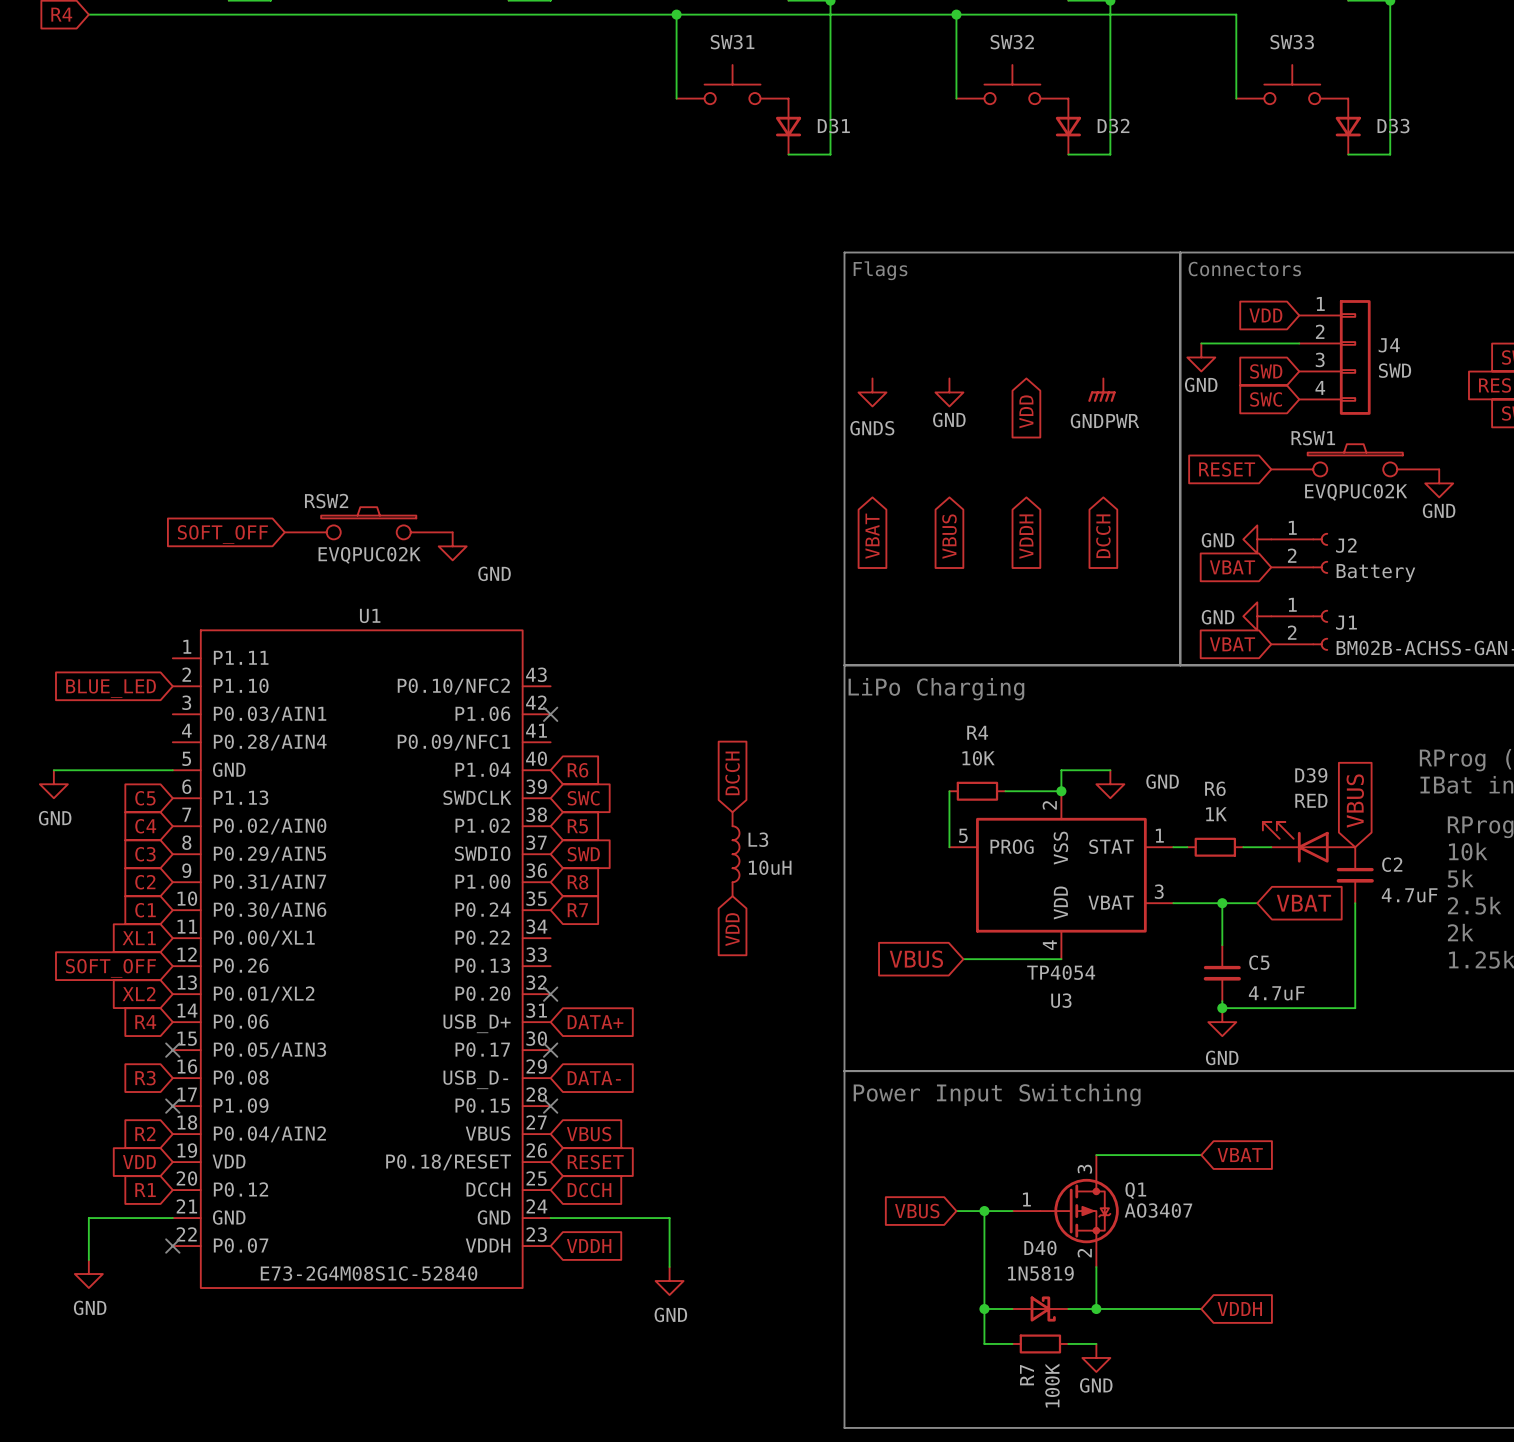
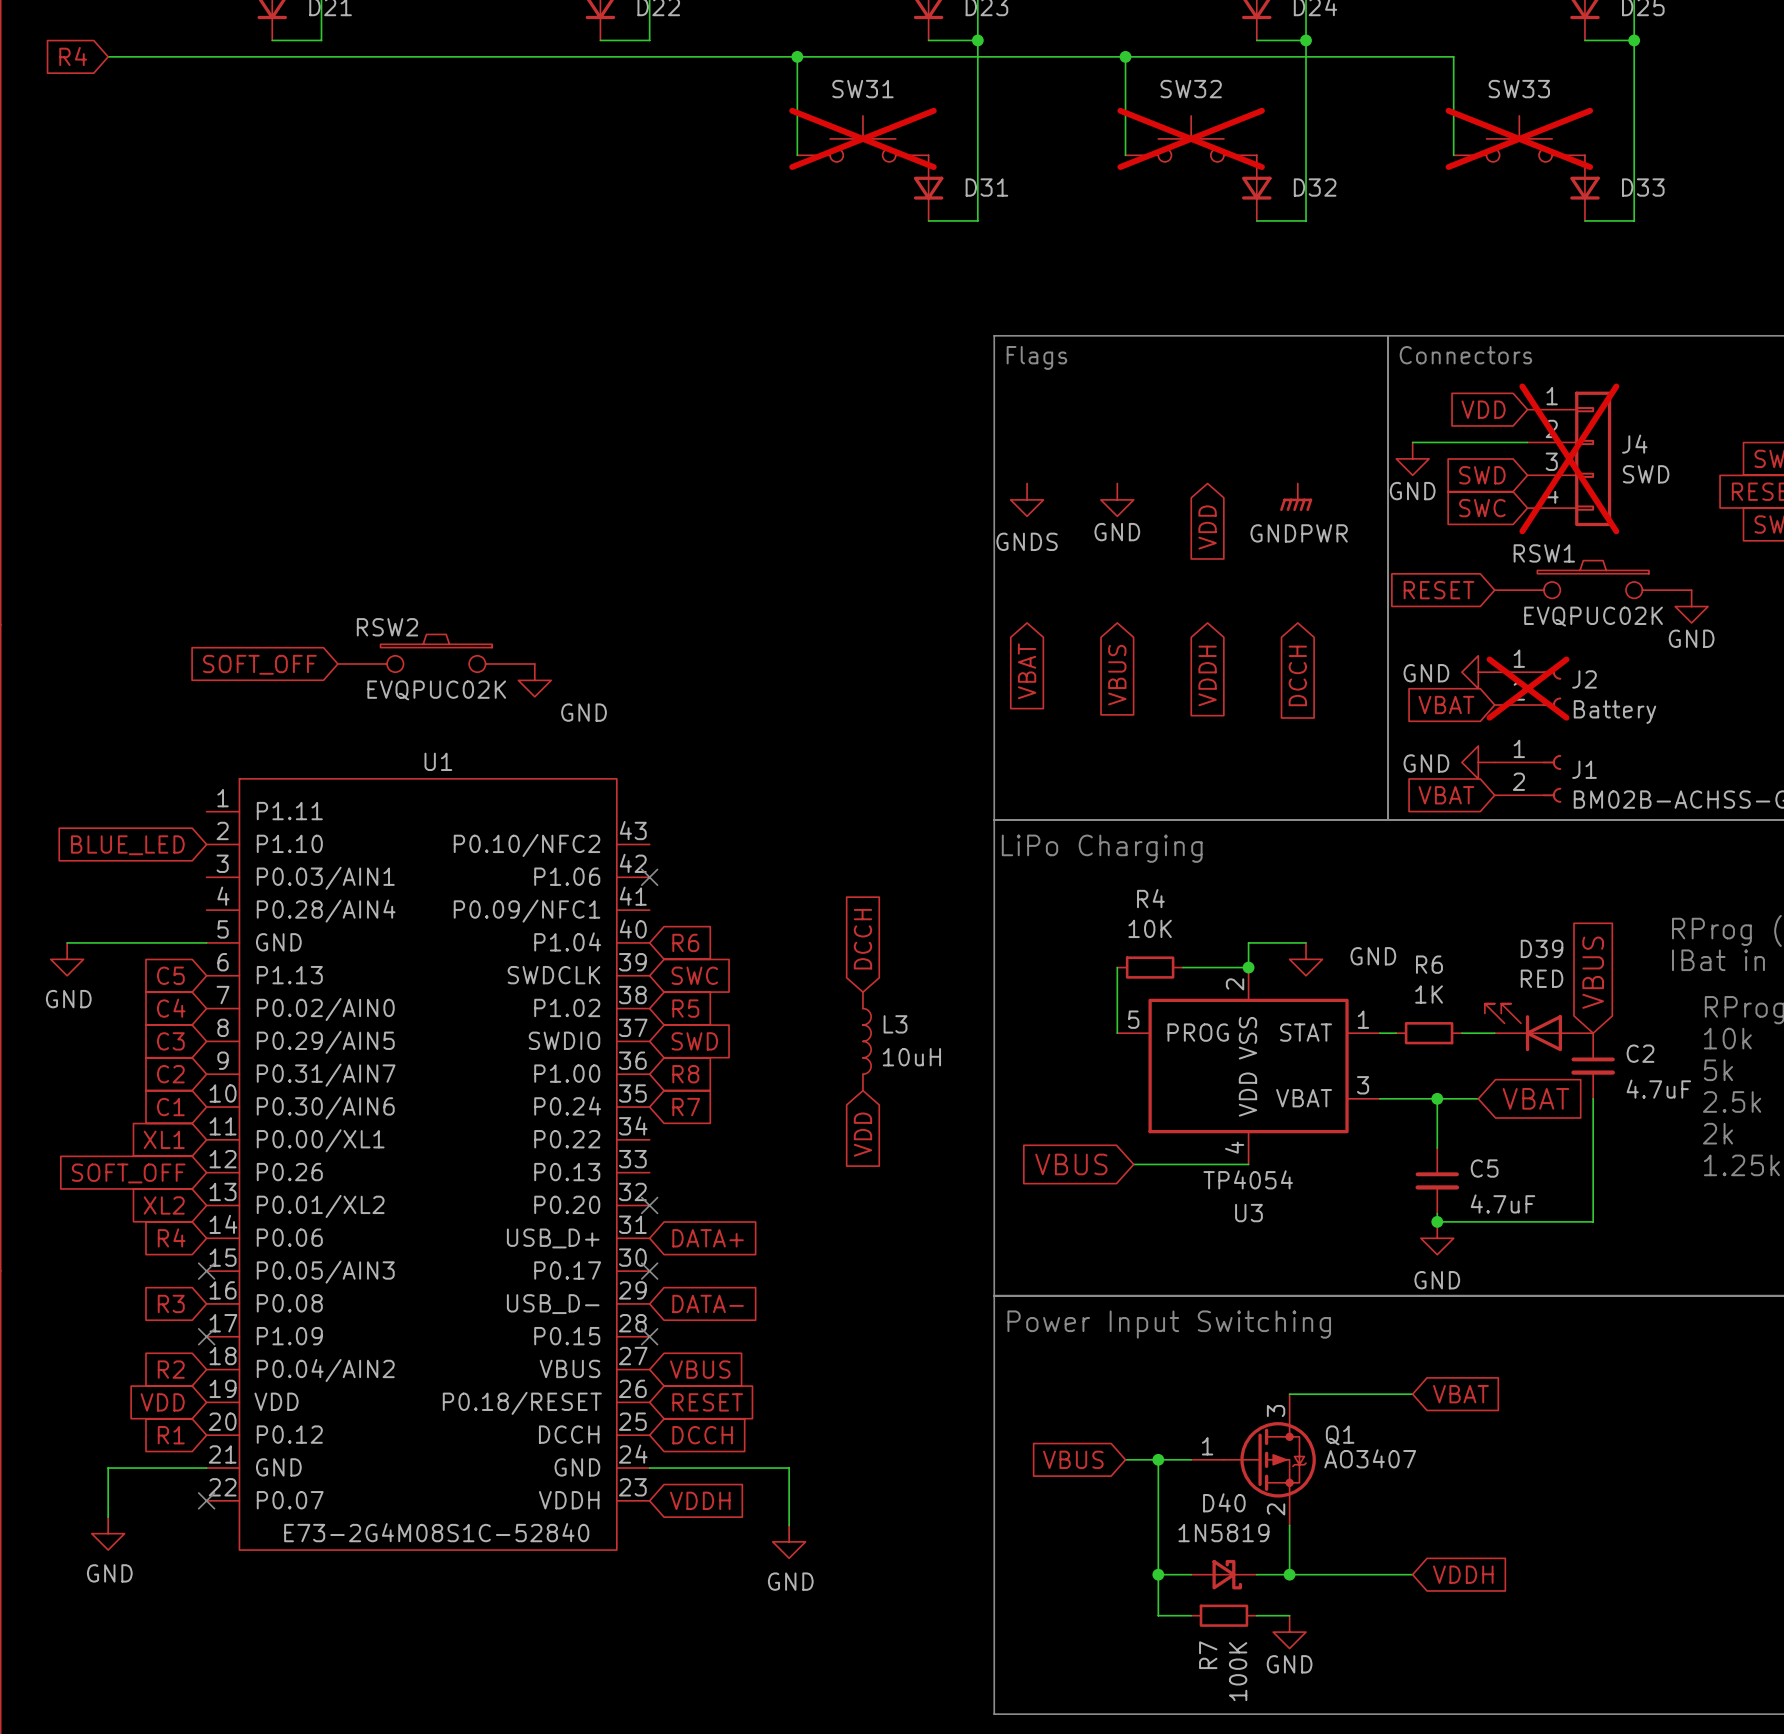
SW31 do-not-place cross: none -> (862, 138)
SW32 do-not-place cross: none -> (1191, 138)
SW33 do-not-place cross: none -> (1519, 138)
J4 do-not-place cross: none -> (1569, 458)
J2 do-not-place cross: none -> (1528, 688)

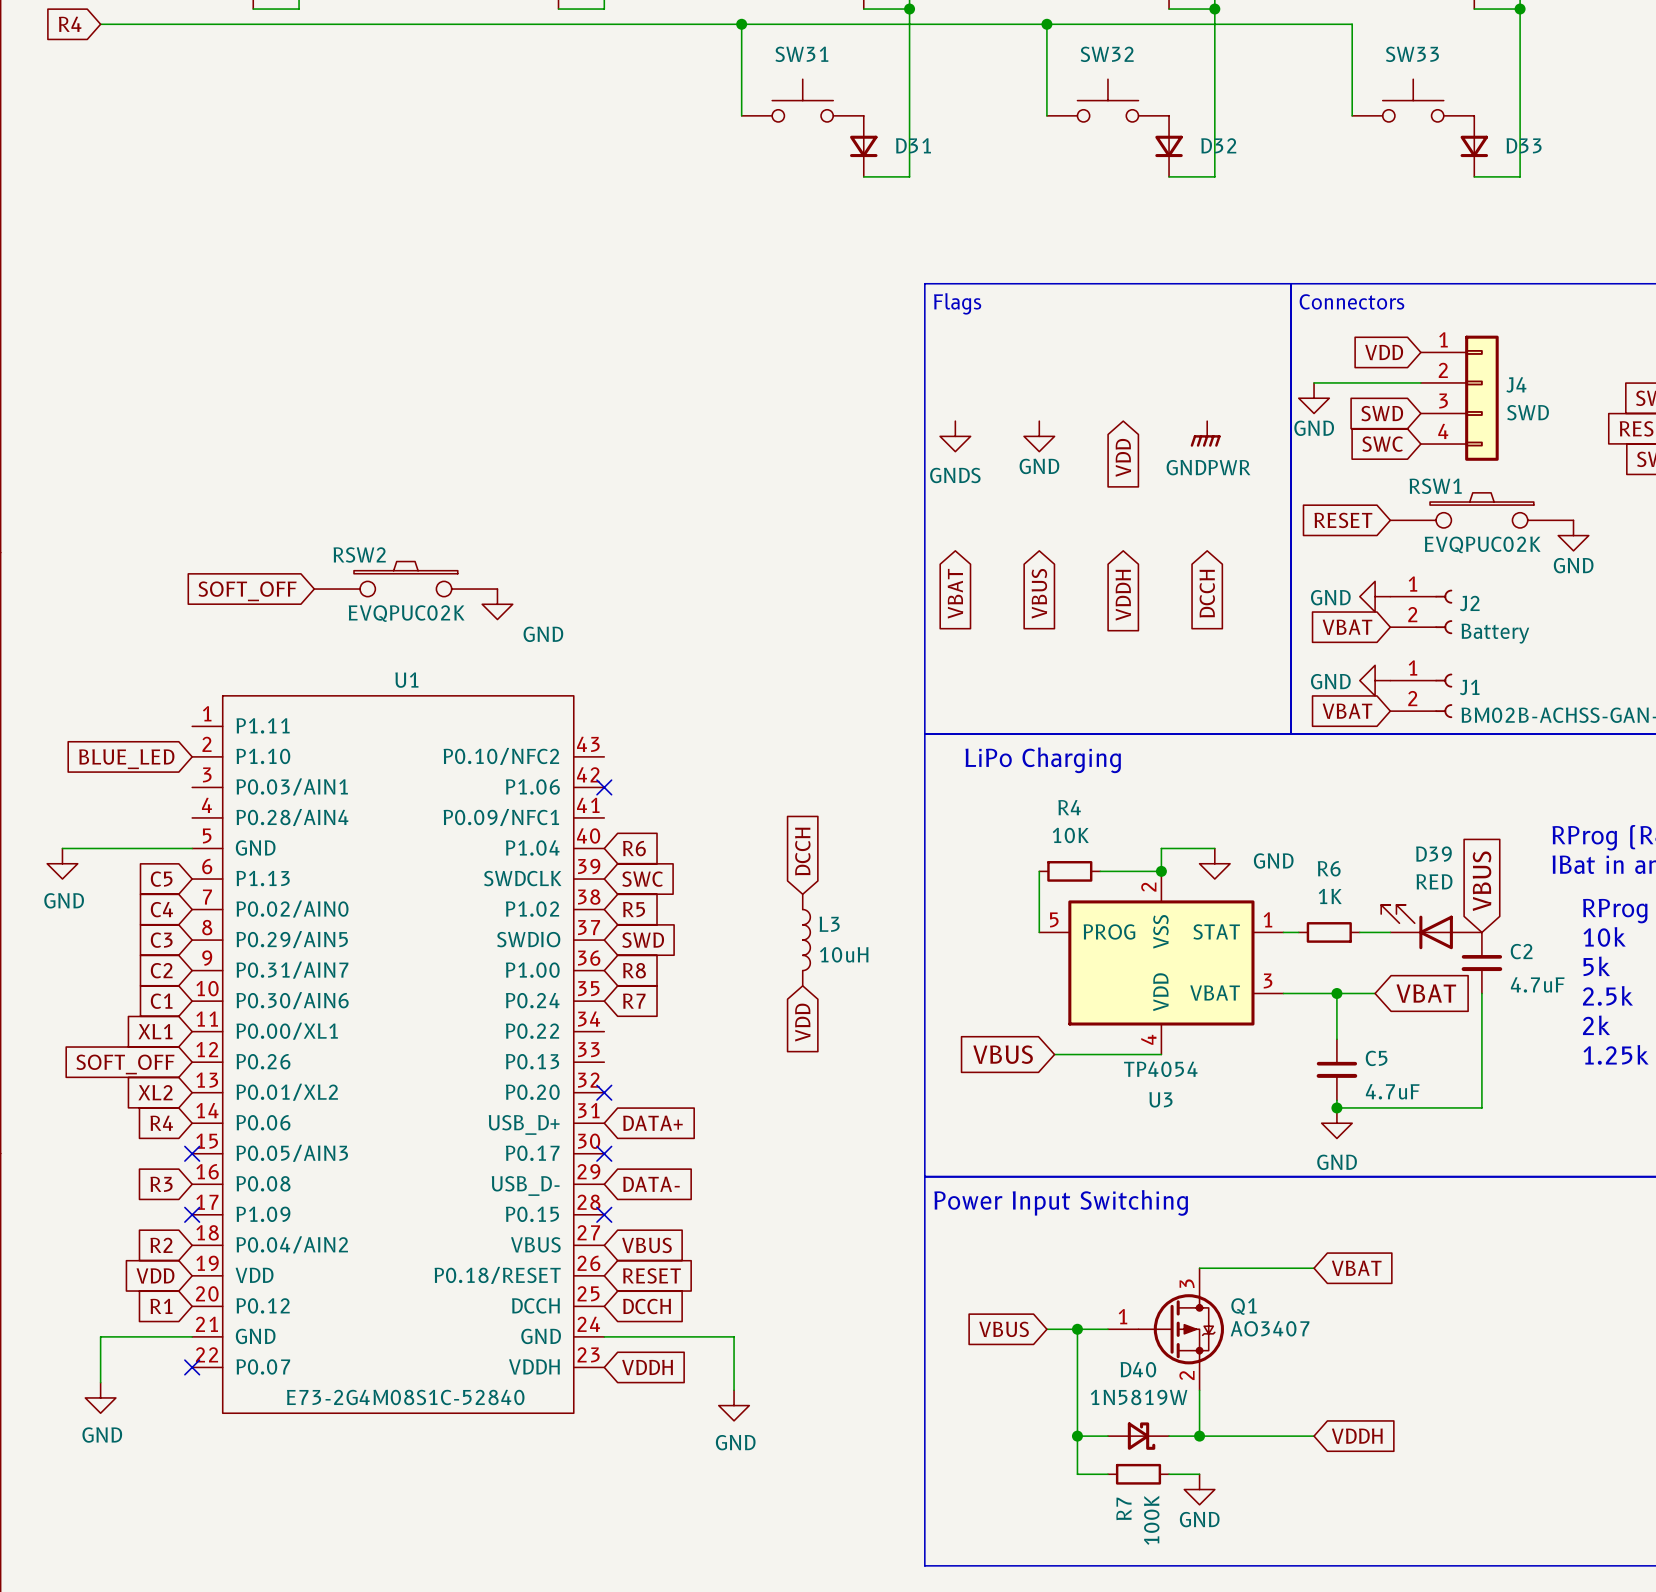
SW31 do-not-place cross: (862, 138) -> none
SW32 do-not-place cross: (1191, 138) -> none
SW33 do-not-place cross: (1519, 138) -> none
J4 do-not-place cross: (1569, 458) -> none
J2 do-not-place cross: (1528, 688) -> none
D40 value: 1N5819 (1223, 1533) -> 1N5819W (1139, 1397)

